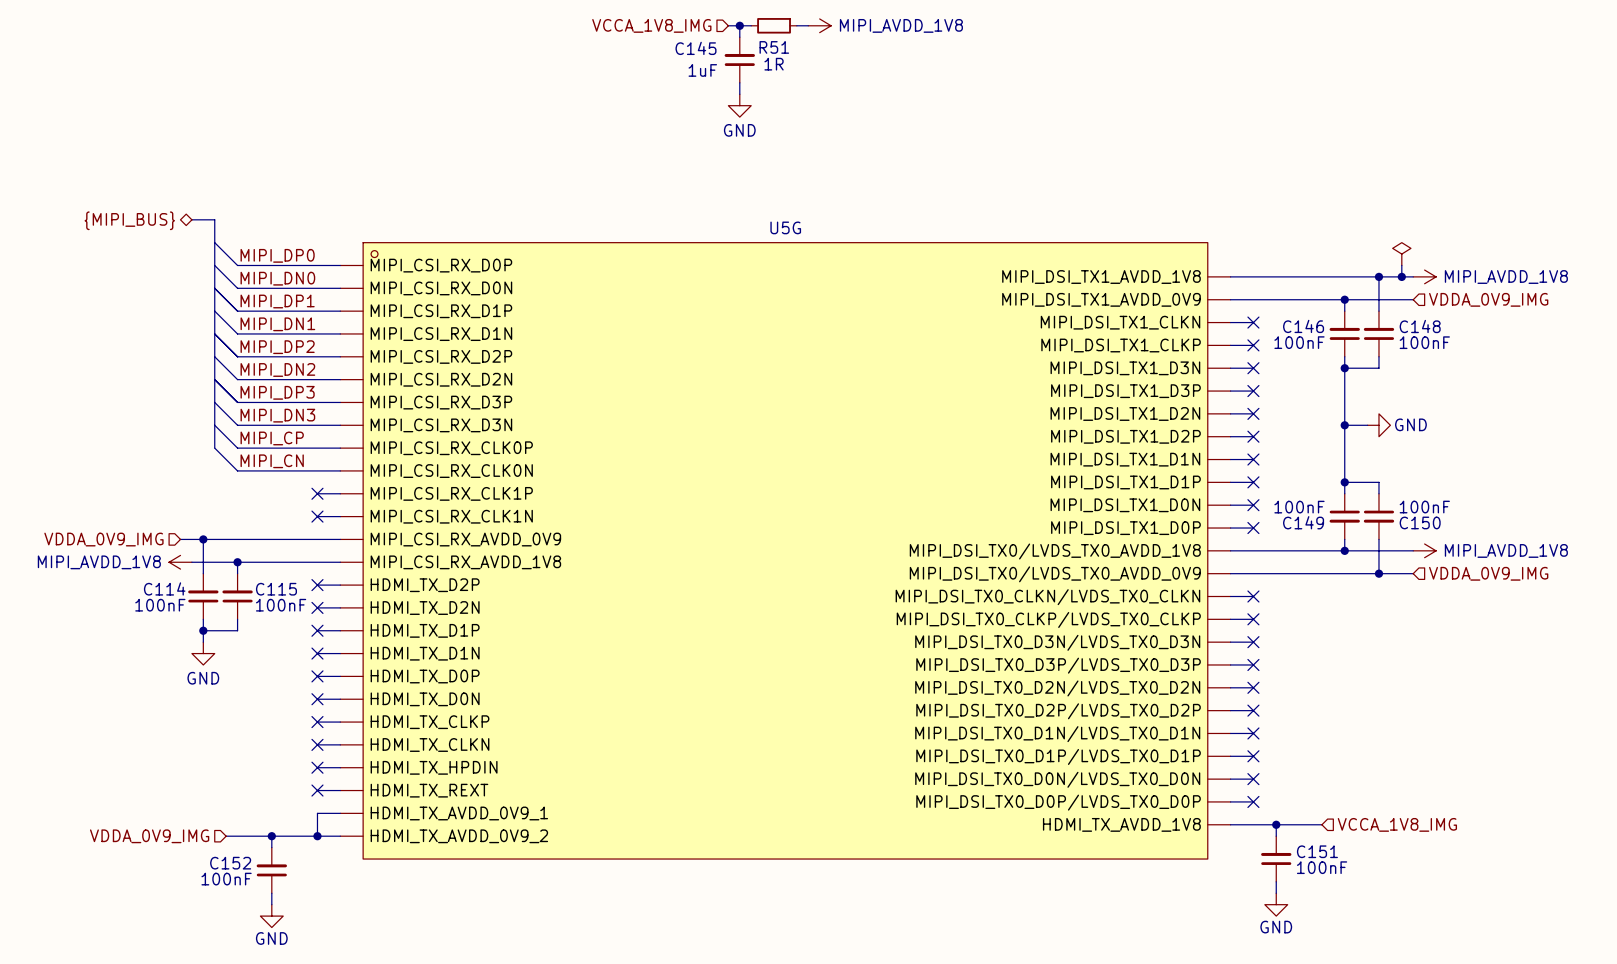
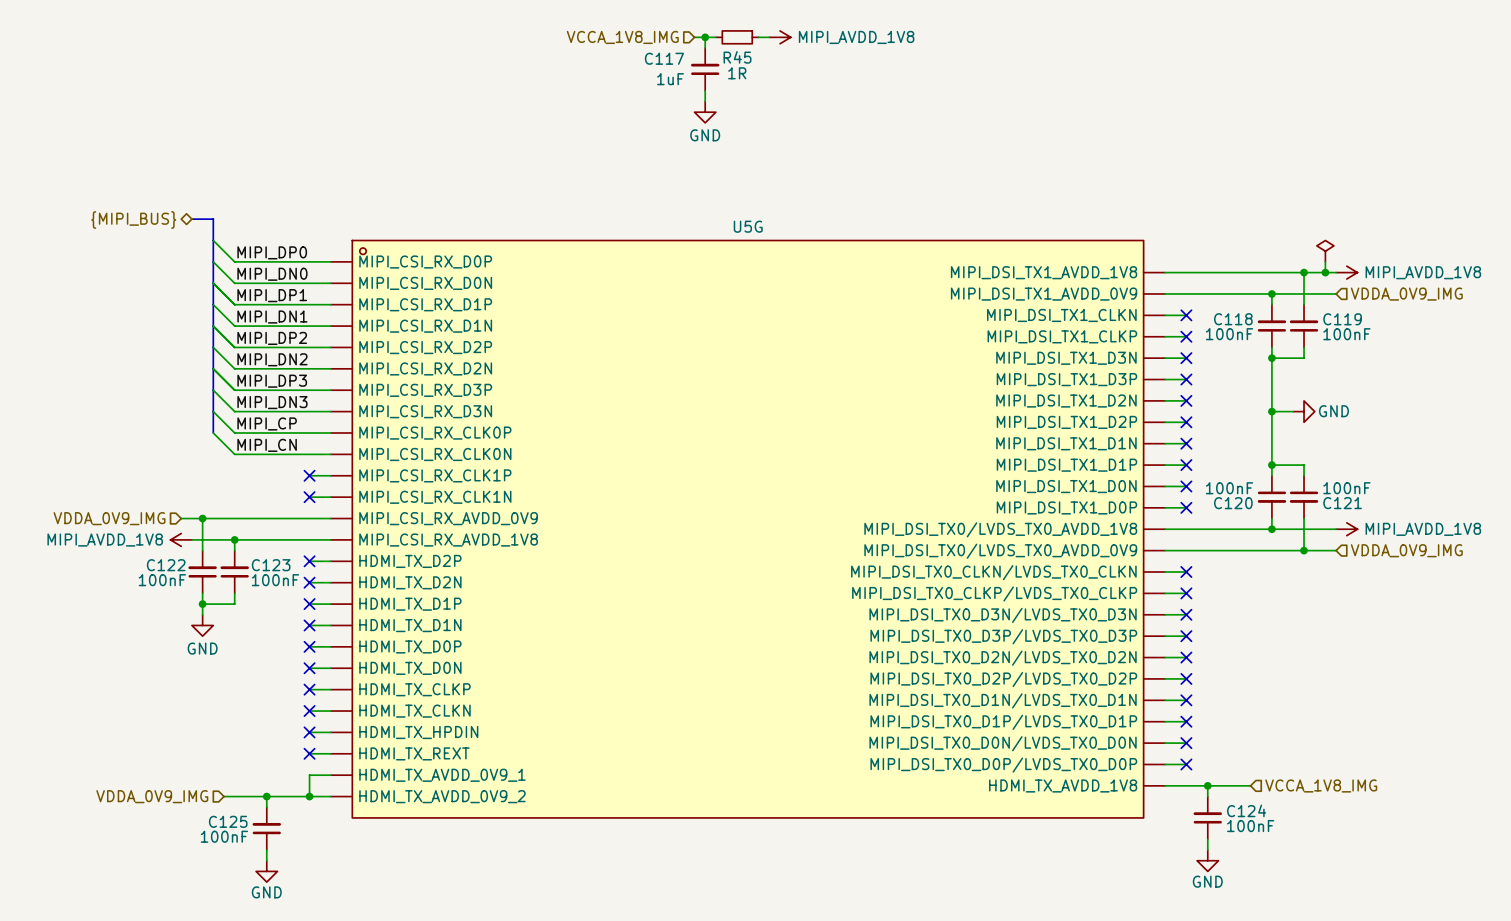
R51 name: R51 (774, 47) -> R45 (737, 57)
C145 name: C145 (695, 48) -> C117 (664, 58)
C146 name: C146 (1303, 326) -> C118 (1233, 319)
C148 name: C148 (1420, 326) -> C119 (1342, 319)
C149 name: C149 (1303, 522) -> C120 (1233, 503)
C150 name: C150 (1420, 522) -> C121 (1342, 503)
C114 name: C114 (164, 588) -> C122 (166, 565)
C115 name: C115 (276, 589) -> C123 (271, 565)
C151 name: C151 (1317, 851) -> C124 (1246, 810)
C152 name: C152 (230, 863) -> C125 (228, 821)

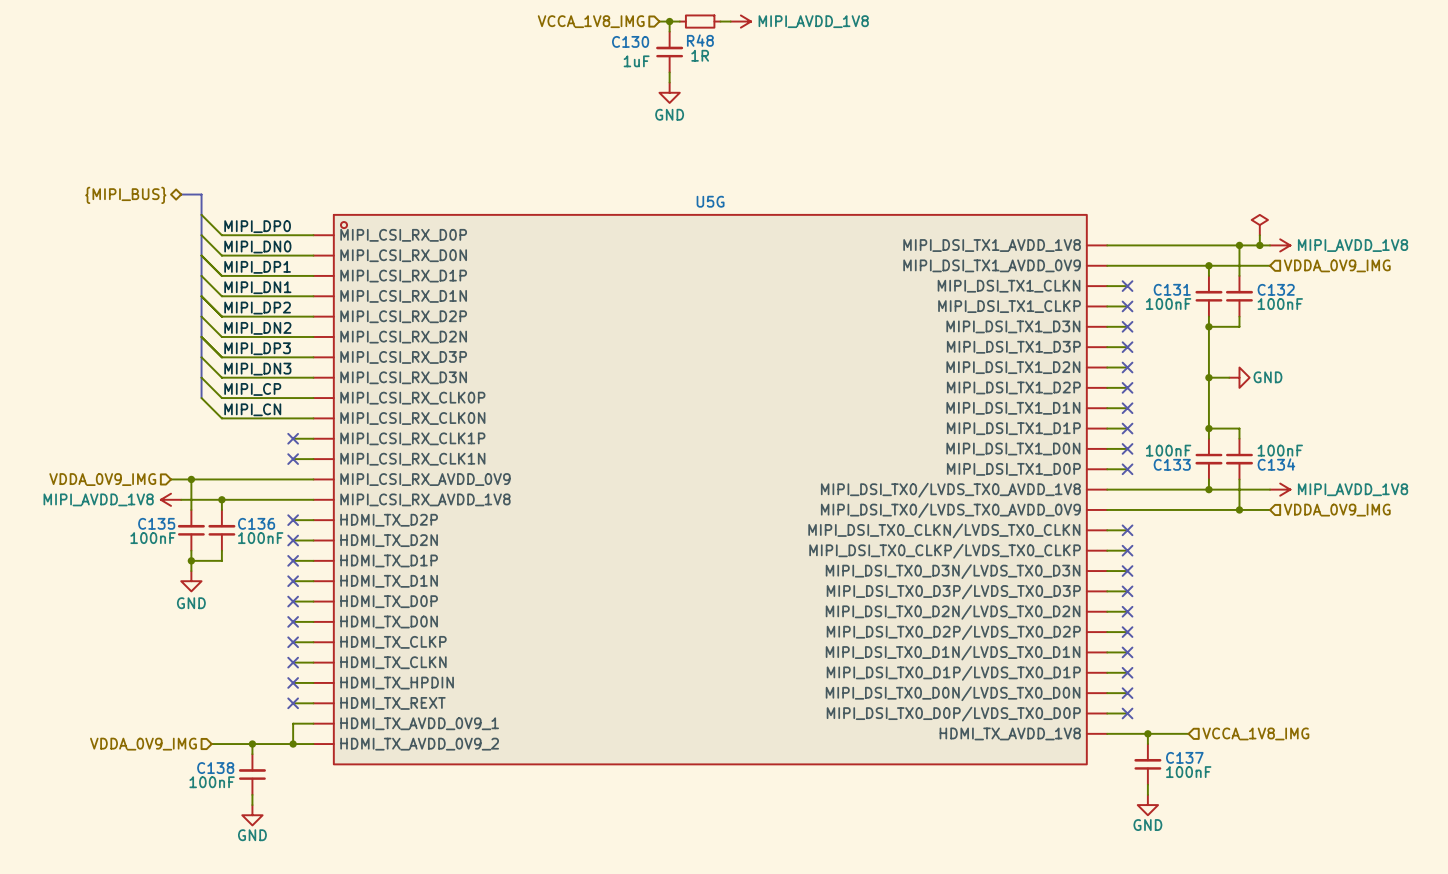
R45 name: R45 (737, 57) -> R48 (700, 40)
C117 name: C117 (664, 58) -> C130 (630, 41)
C118 name: C118 (1233, 319) -> C131 (1172, 289)
C119 name: C119 (1342, 319) -> C132 (1276, 289)
C120 name: C120 (1233, 503) -> C133 (1172, 464)
C121 name: C121 (1342, 503) -> C134 (1276, 464)
C122 name: C122 (166, 565) -> C135 (156, 523)
C123 name: C123 (271, 565) -> C136 (256, 523)
C124 name: C124 (1246, 810) -> C137 (1184, 757)
C125 name: C125 (228, 821) -> C138 (215, 768)

